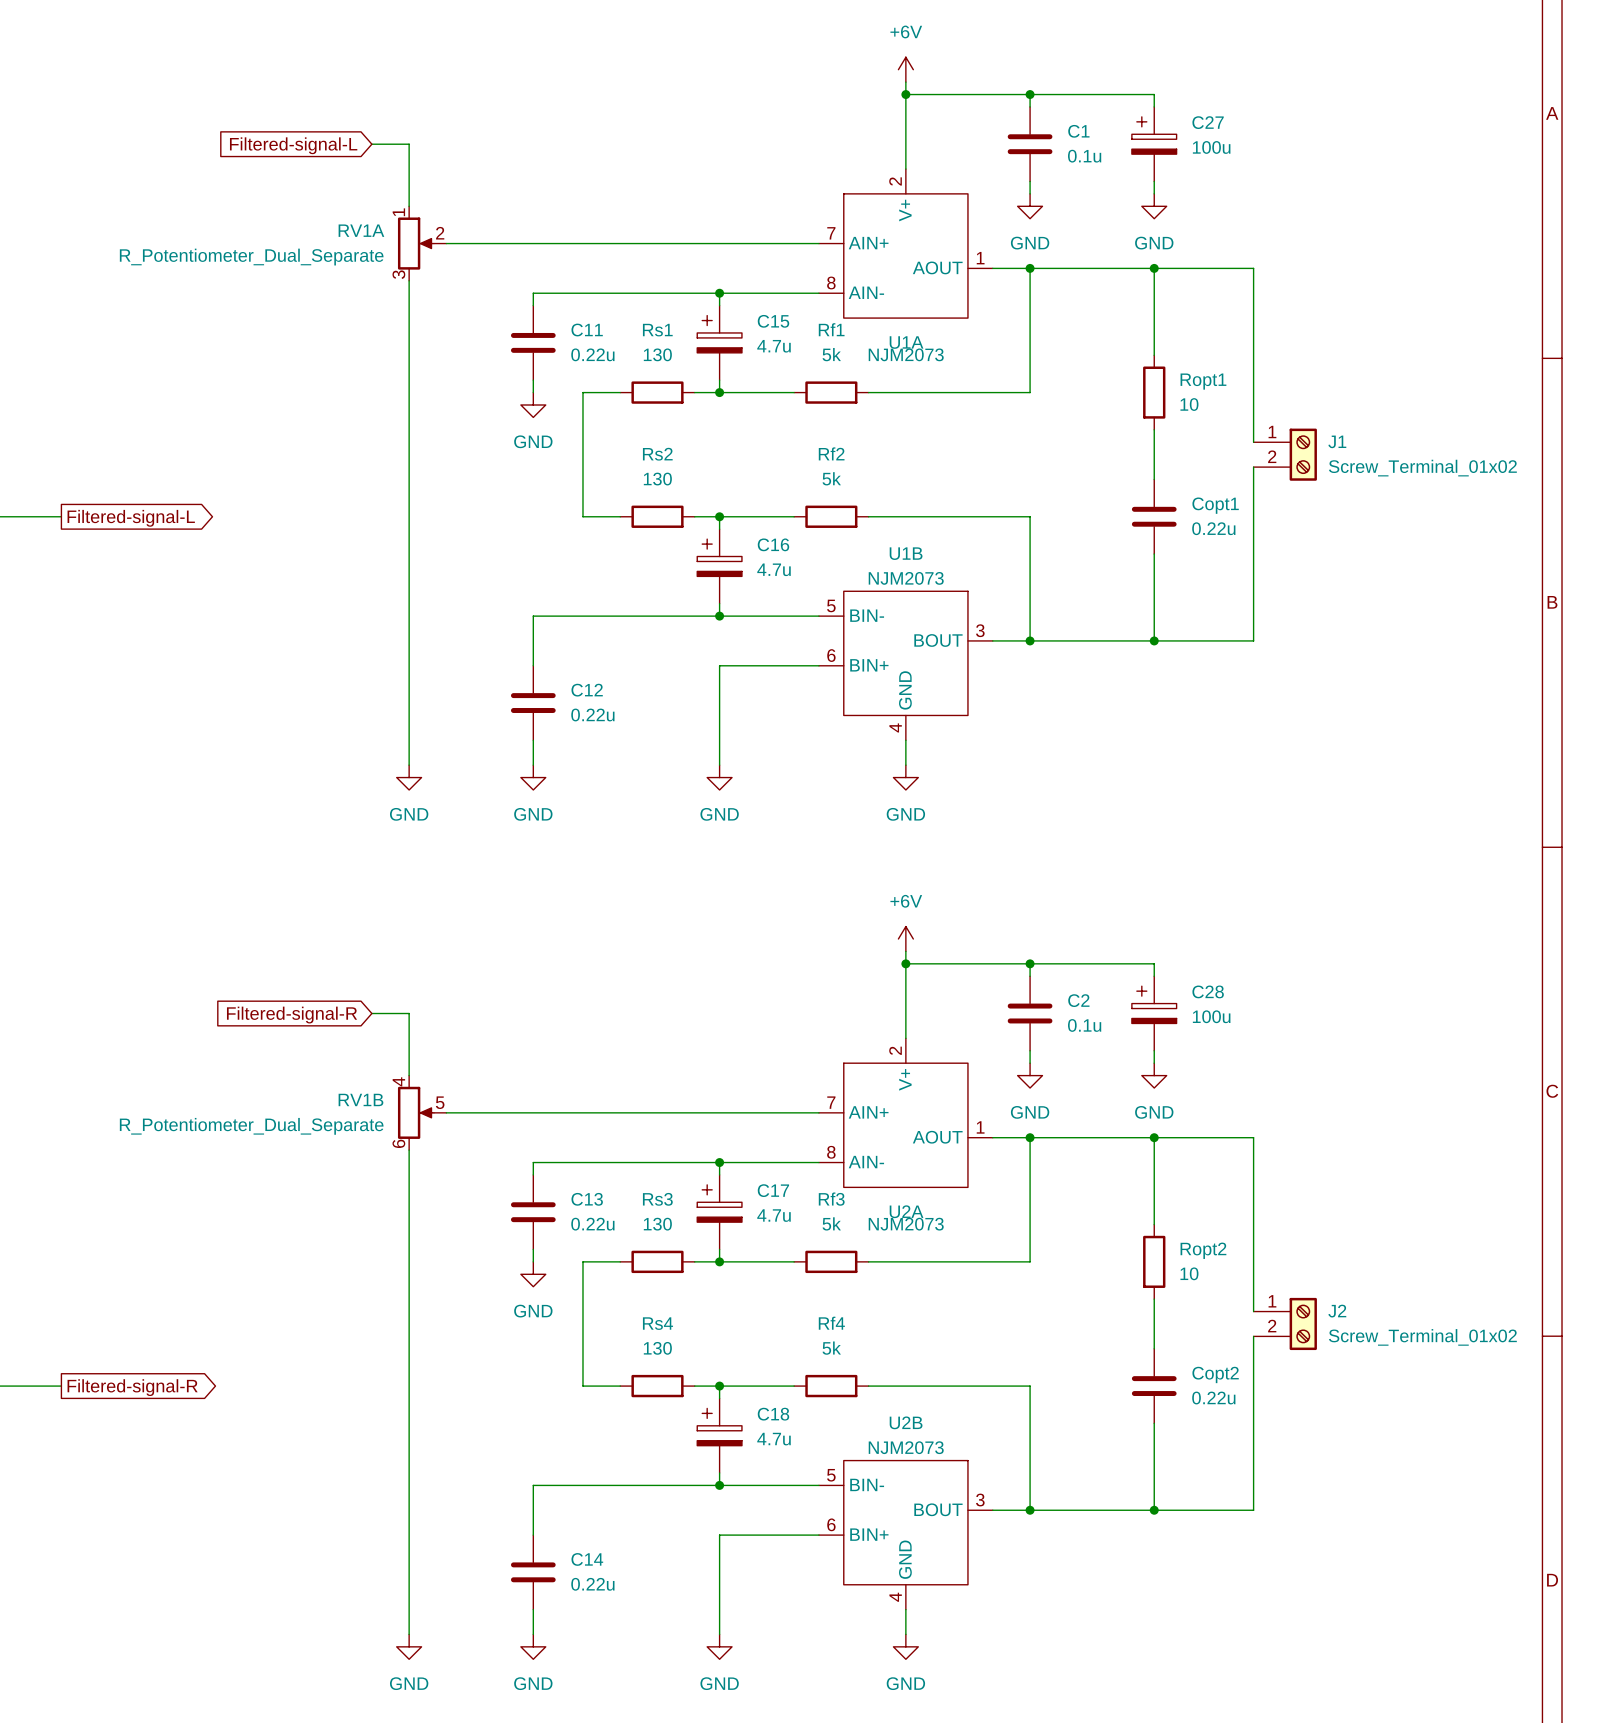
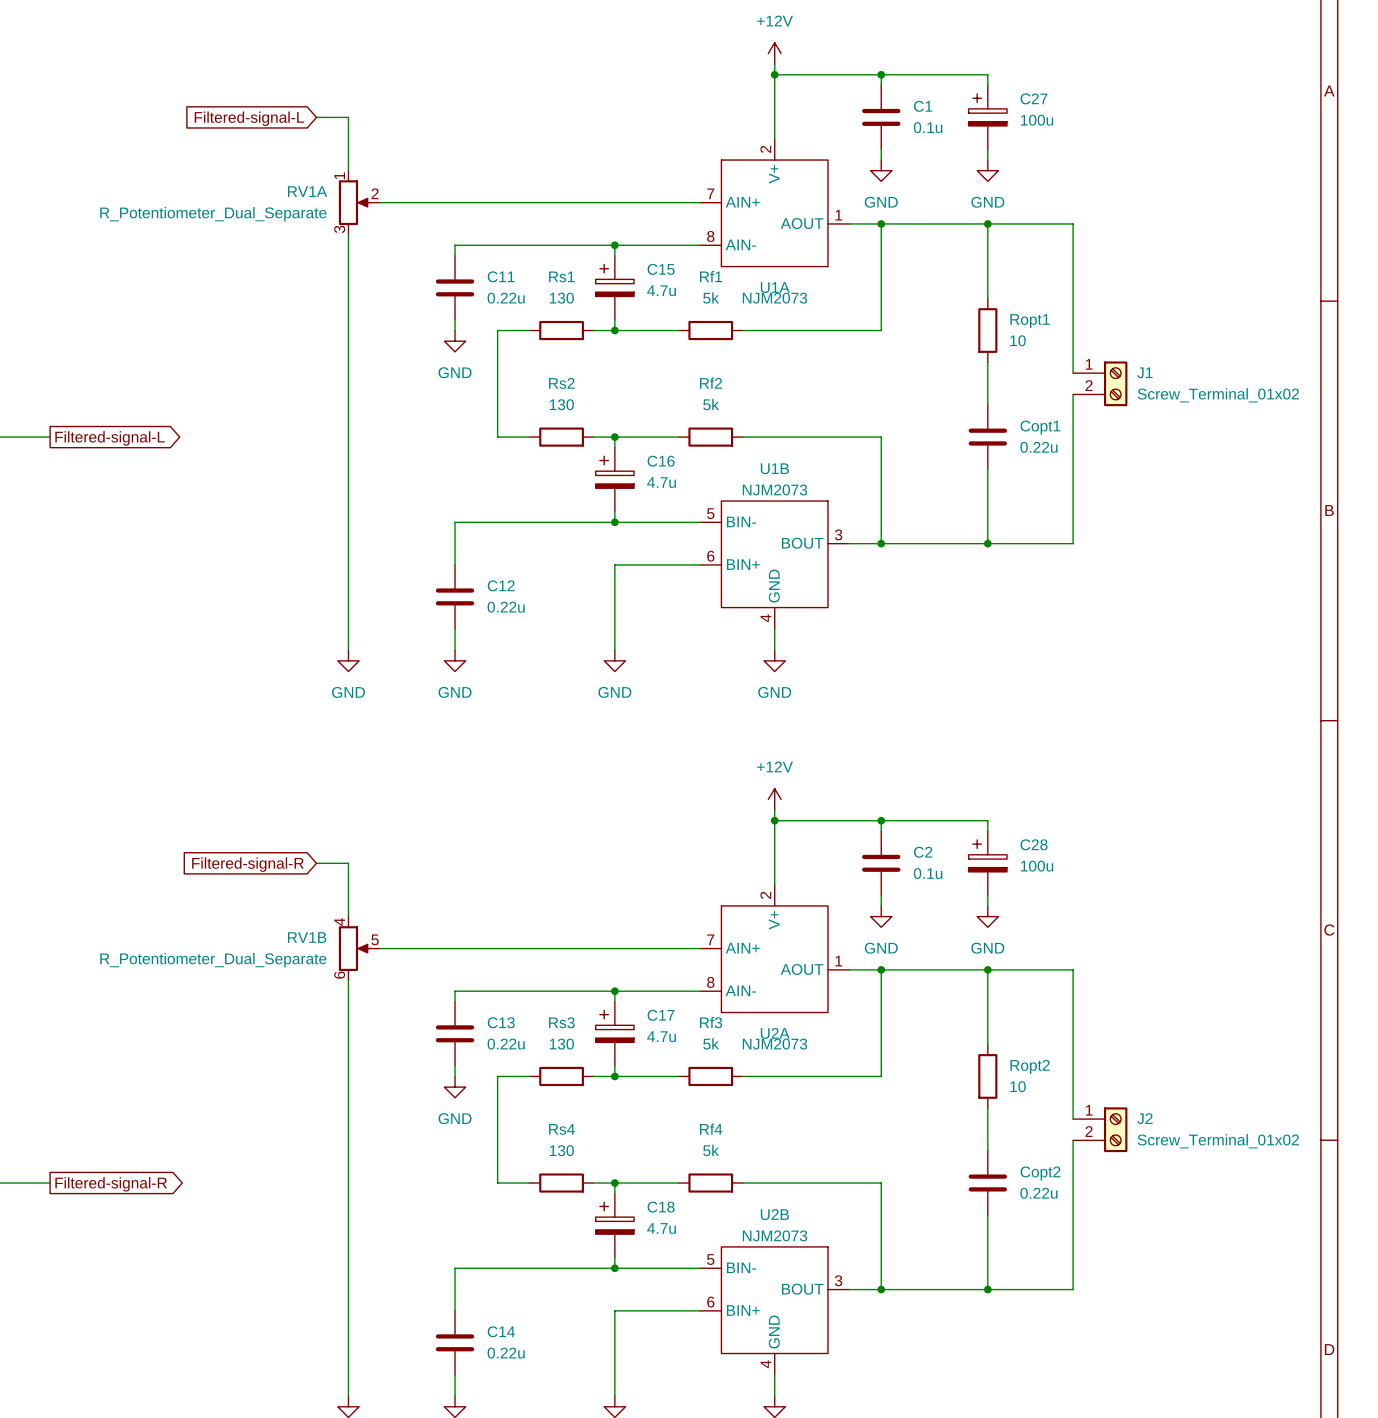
power symbol: +6V (905, 69) -> +12V (774, 53)
power symbol: +6V (905, 939) -> +12V (774, 799)

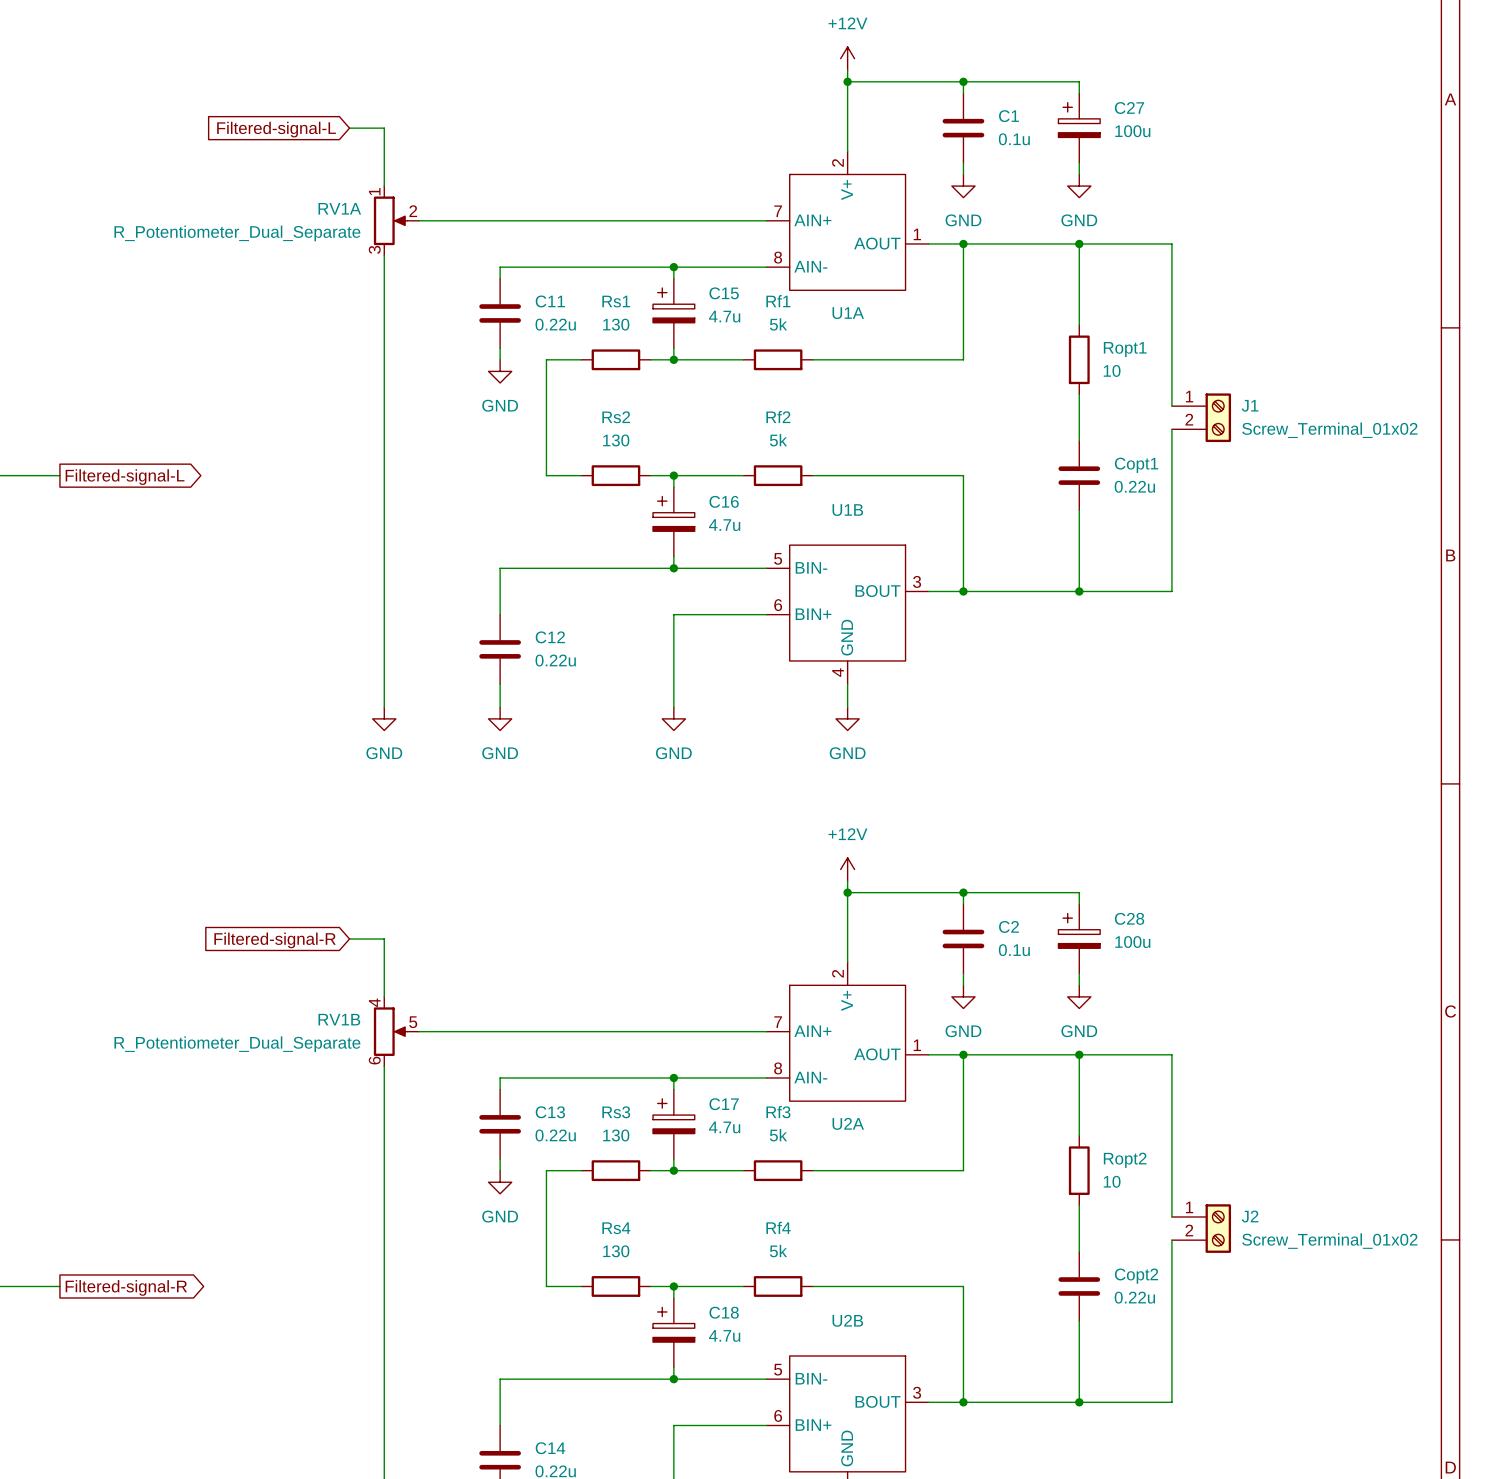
U1A value: NJM2073 (774, 298) -> none
U1B value: NJM2073 (774, 489) -> none
U2A value: NJM2073 (774, 1044) -> none
U2B value: NJM2073 (774, 1235) -> none

